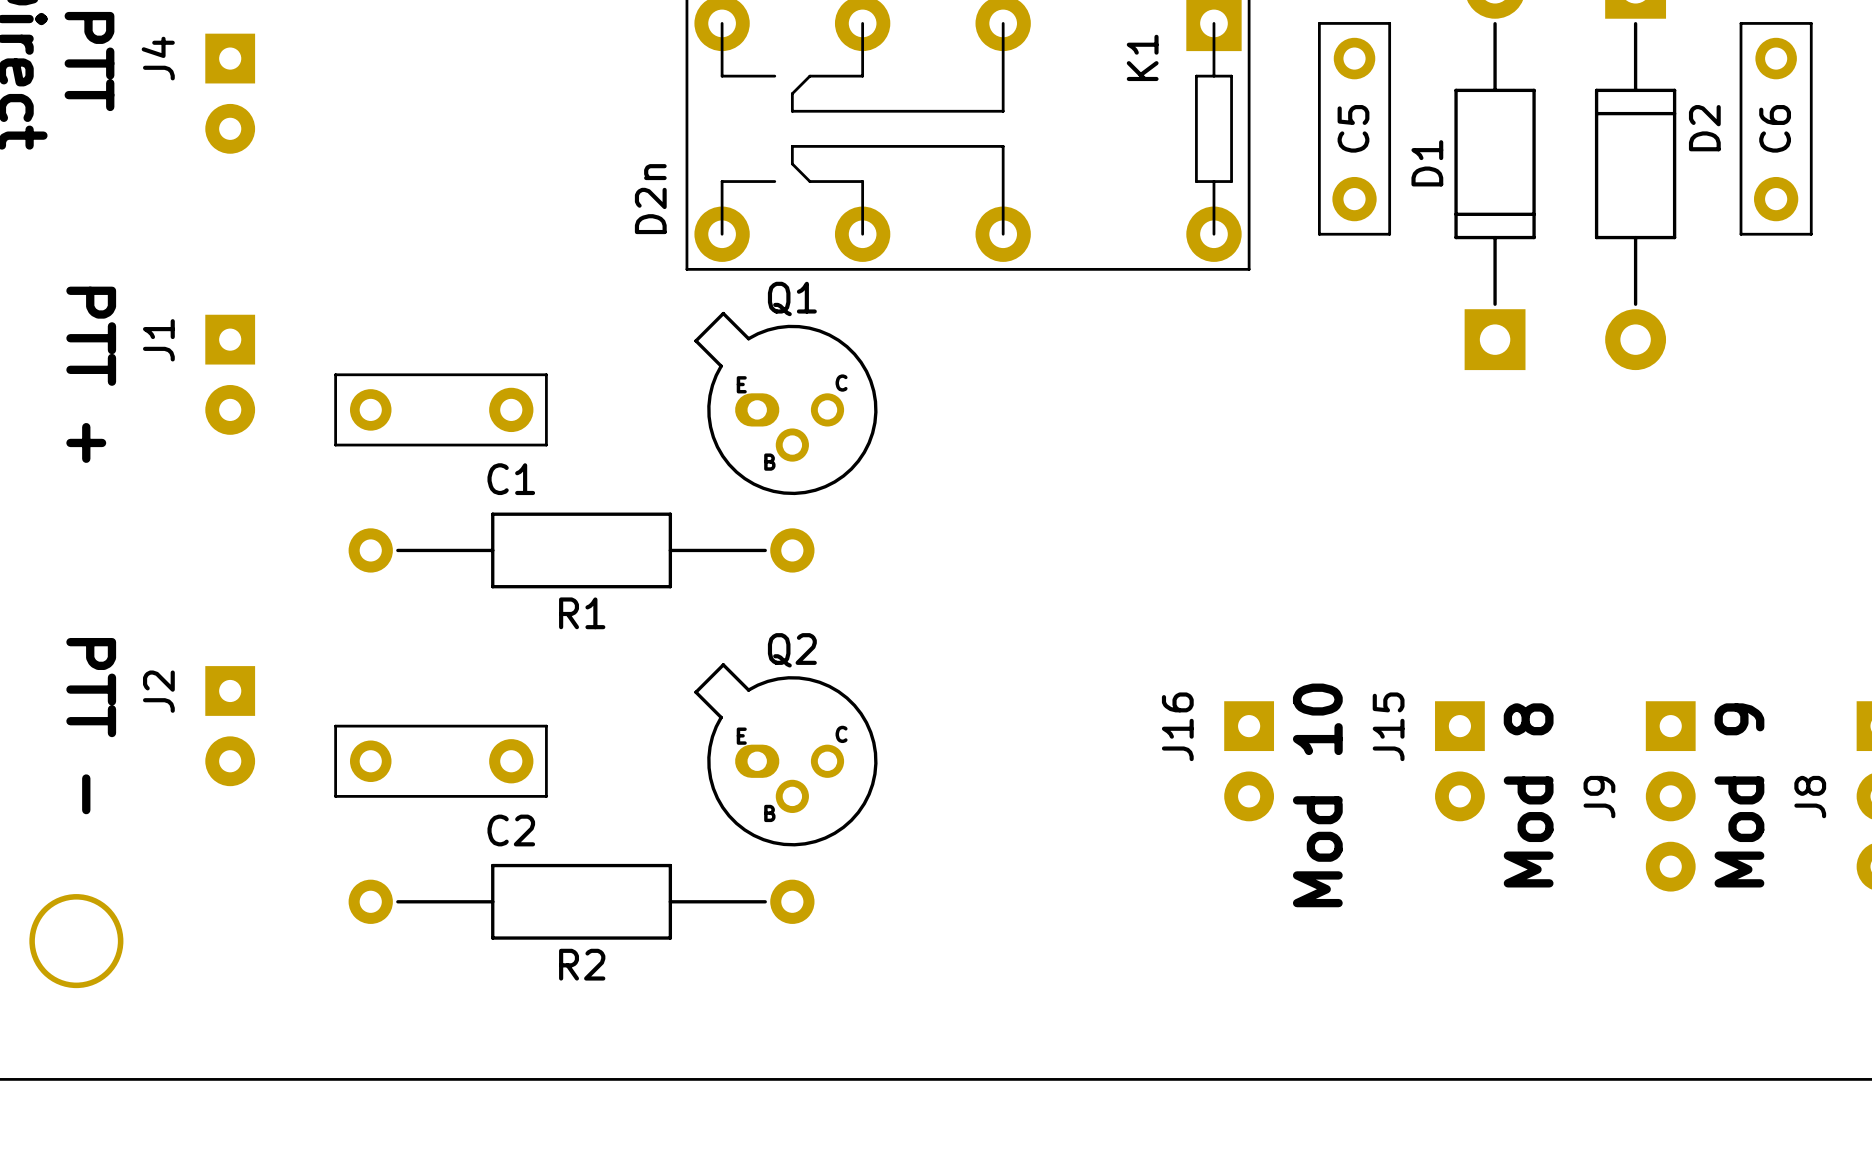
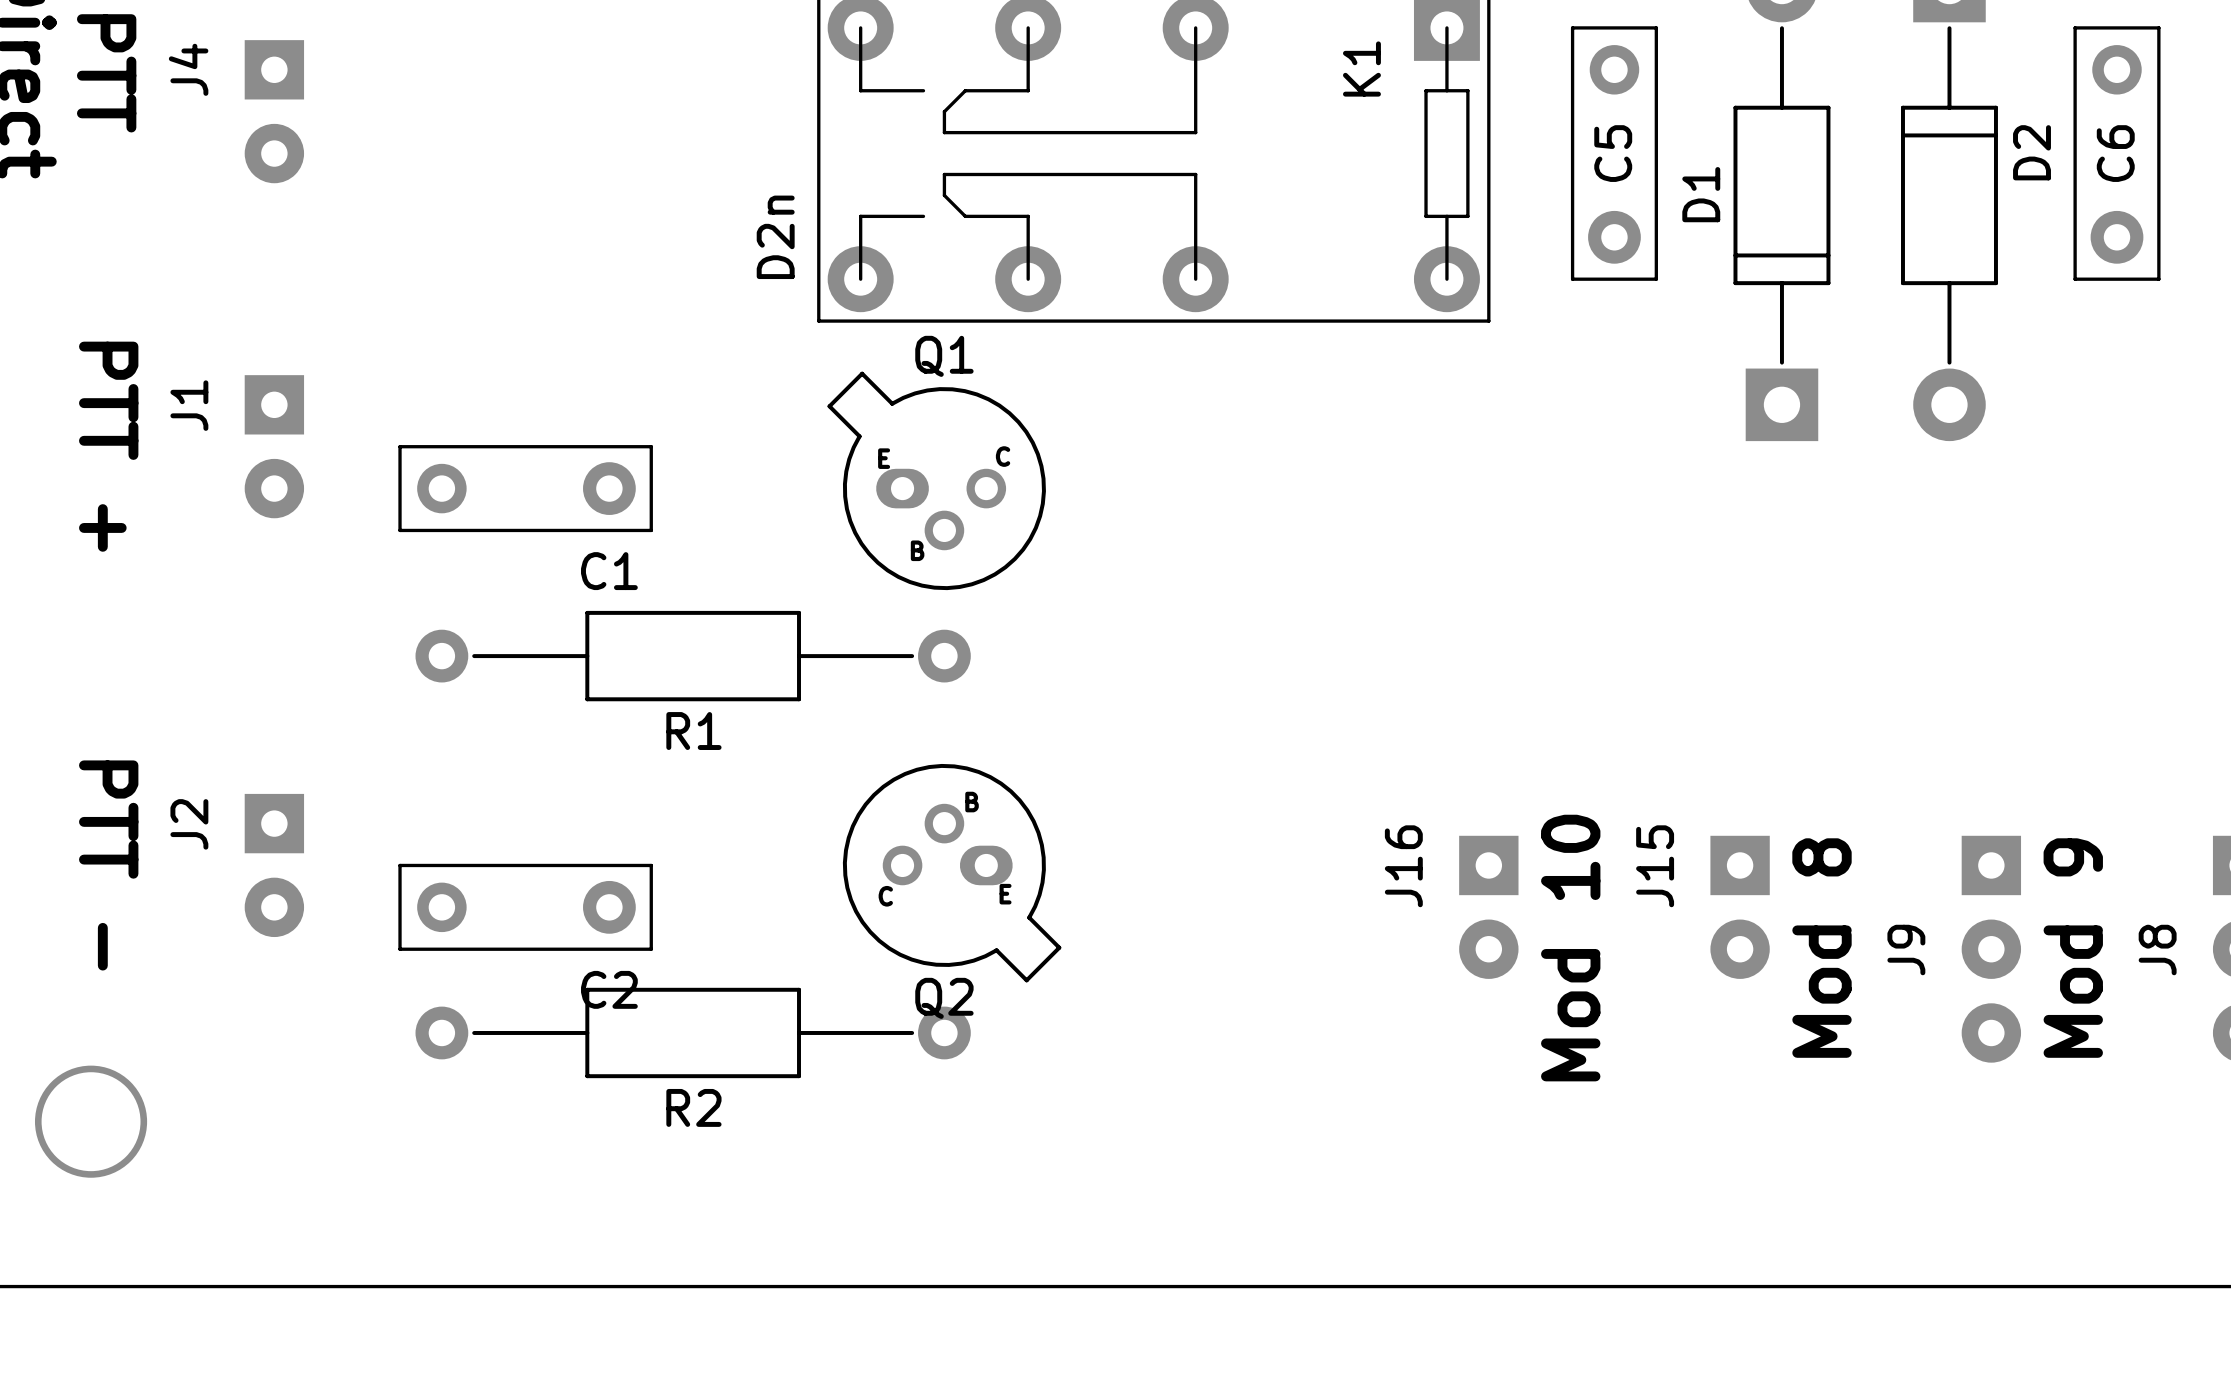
Q2 rotation: 0° (785, 754) -> 180° (952, 873)
R2 position: (581, 901) -> (693, 1032)

